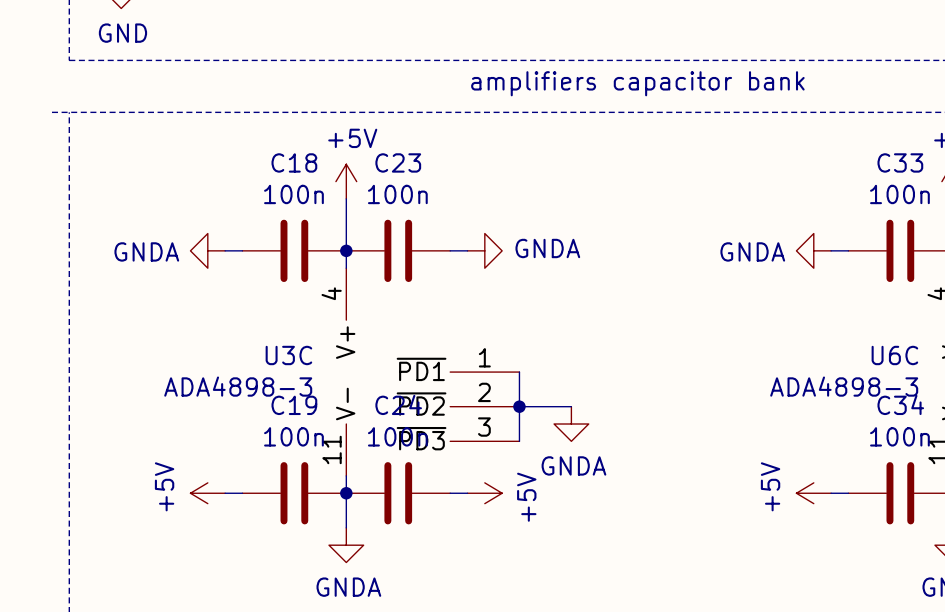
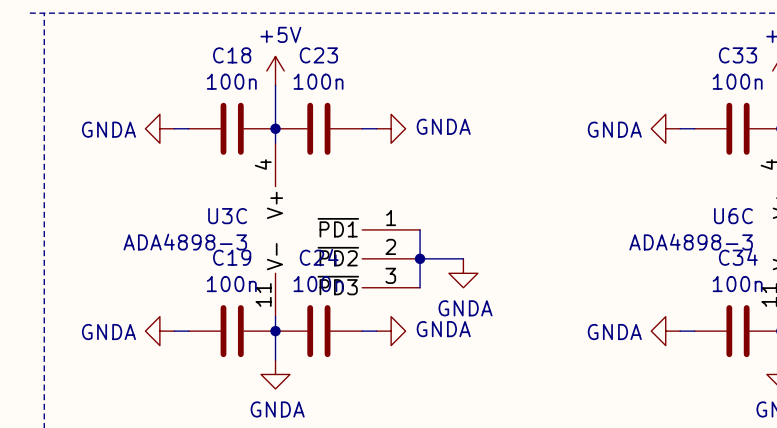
power symbol: +5V (207, 493) -> GNDA (159, 331)
power symbol: +5V (484, 493) -> GNDA (391, 331)
power symbol: +5V (813, 493) -> GNDA (665, 331)

